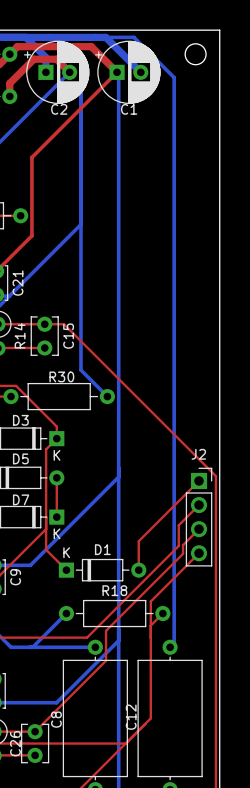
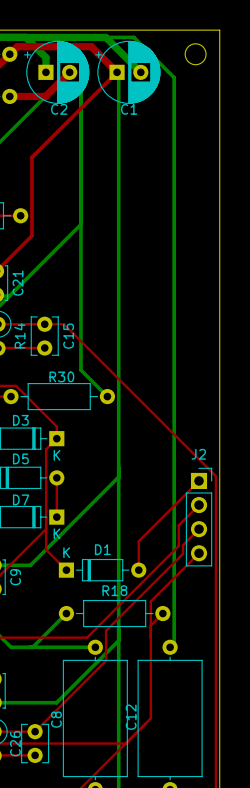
top track: (69, 72) (56, 59) (33, 59) (9, 83) (9, 96) -> (69, 72) (45, 96) (9, 96)

